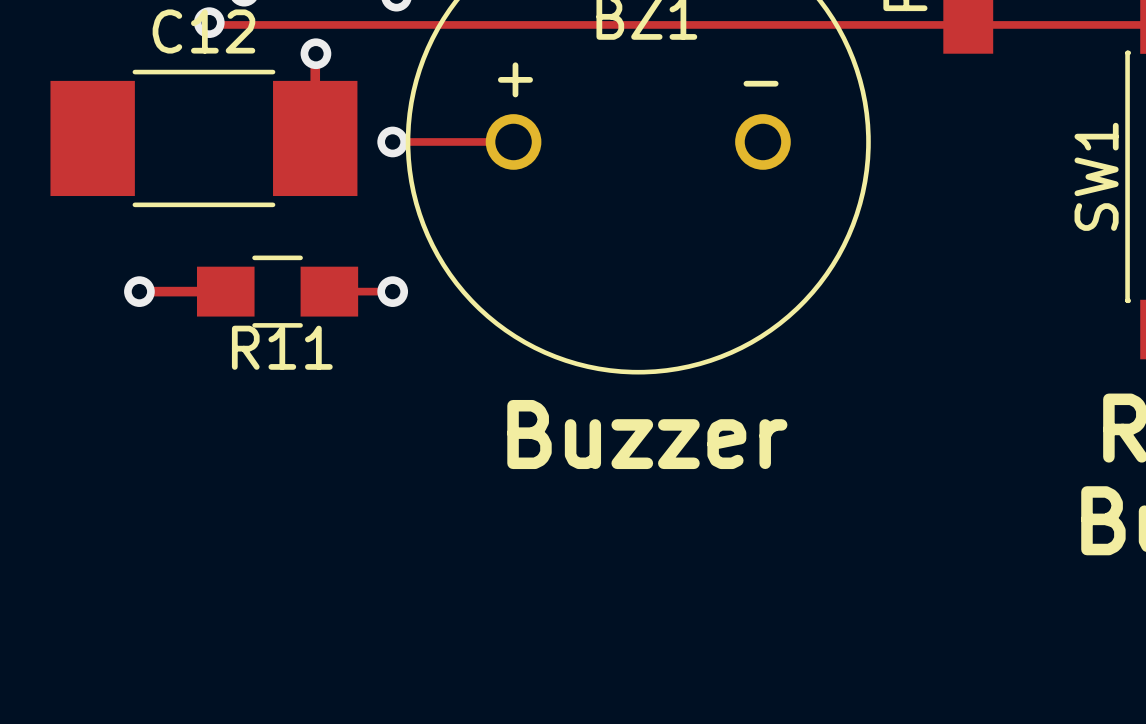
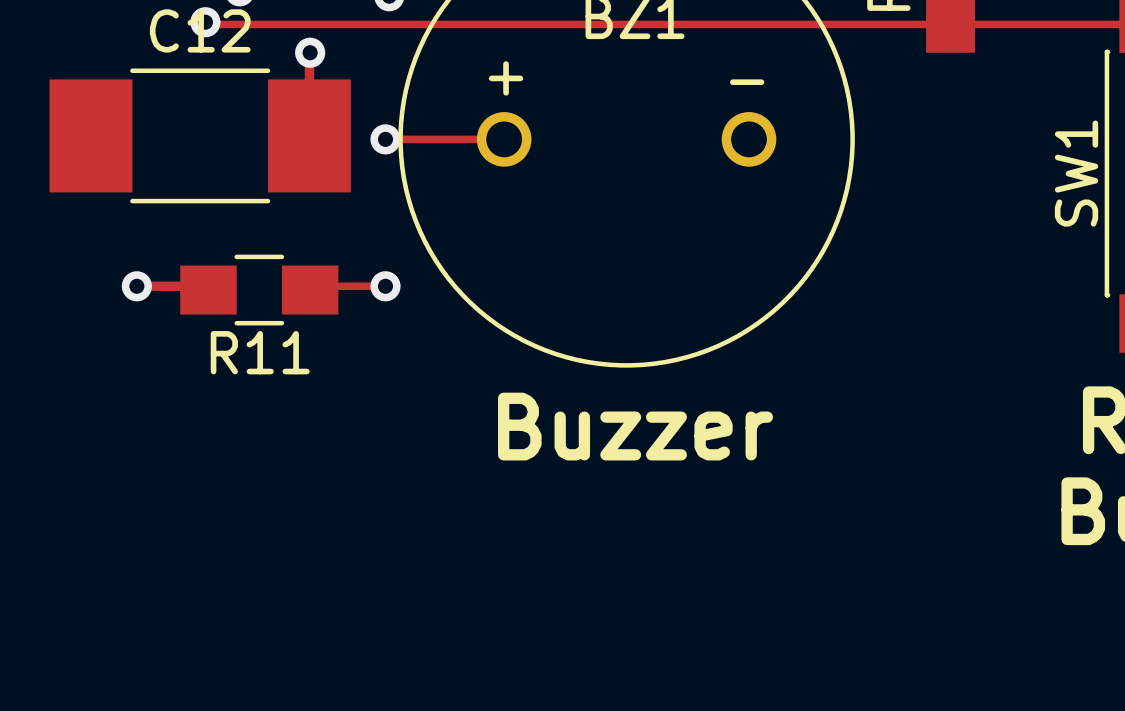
R11 position: (277, 291) -> (259, 290)
R11 name position: R11 (282, 347) -> R11 (260, 352)

